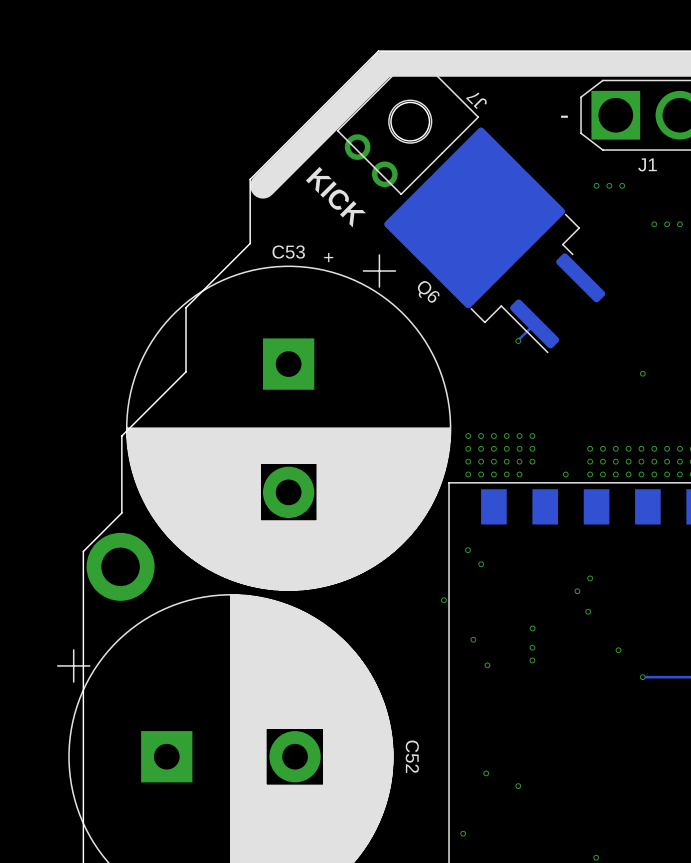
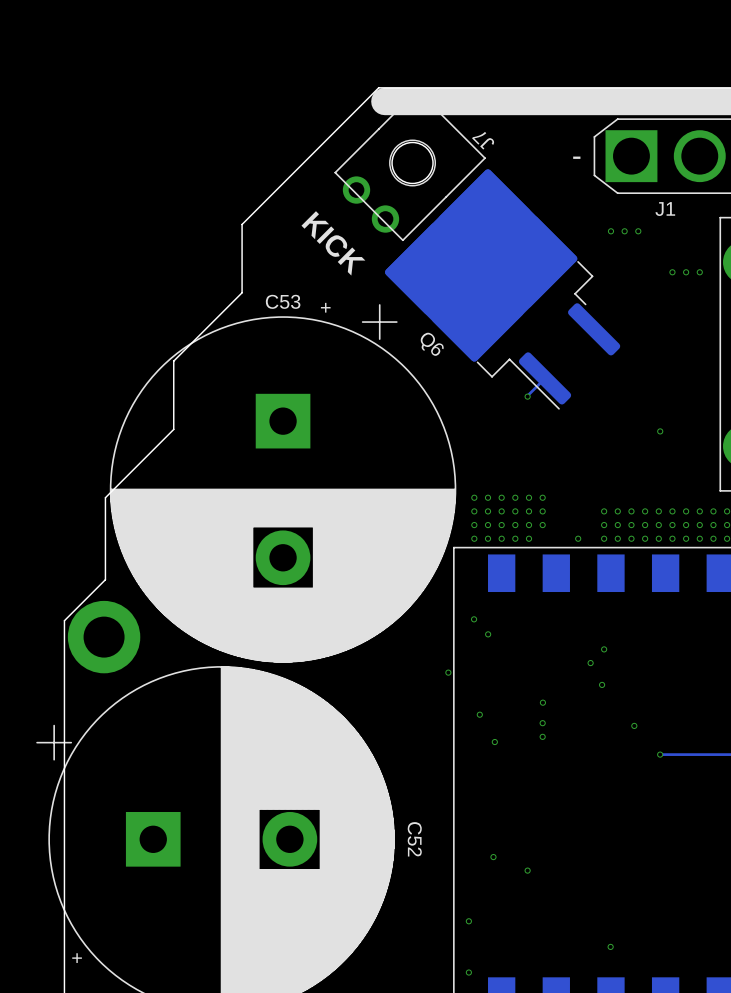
line: (384, 63) (262, 185) -> none

